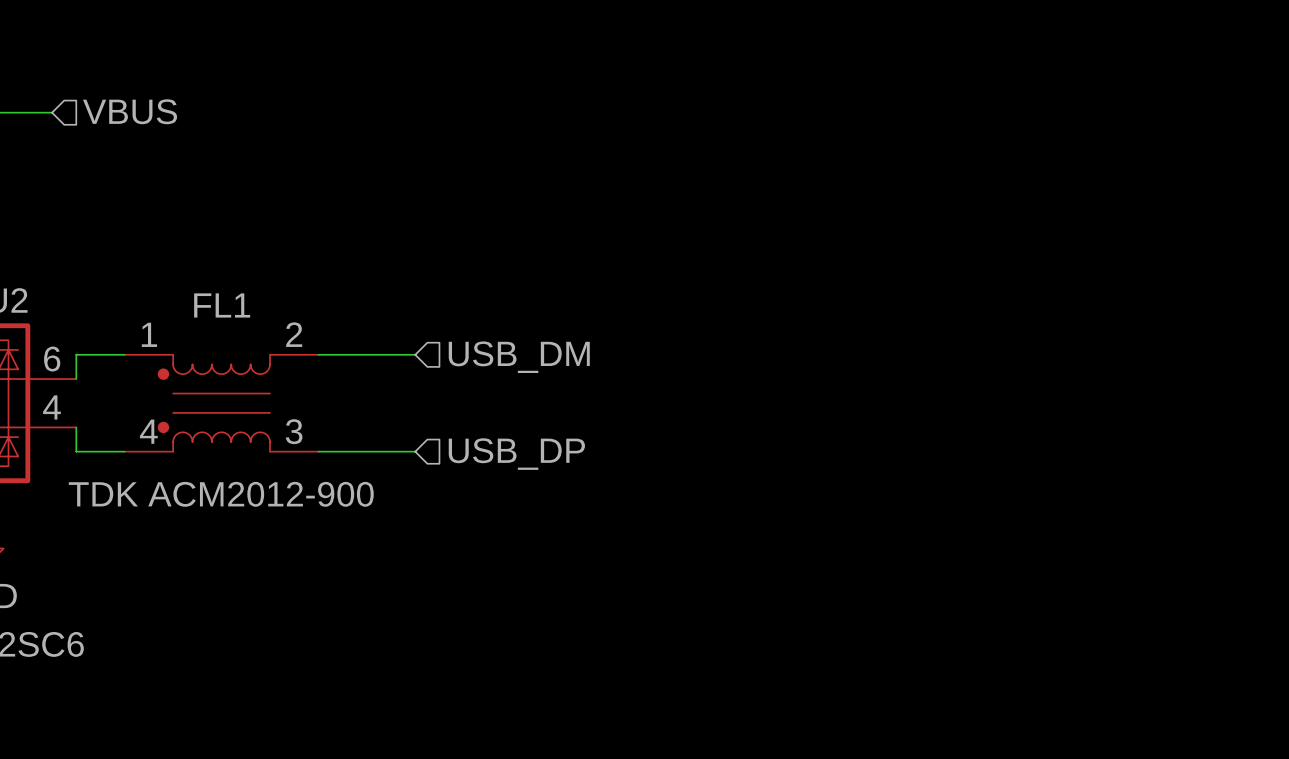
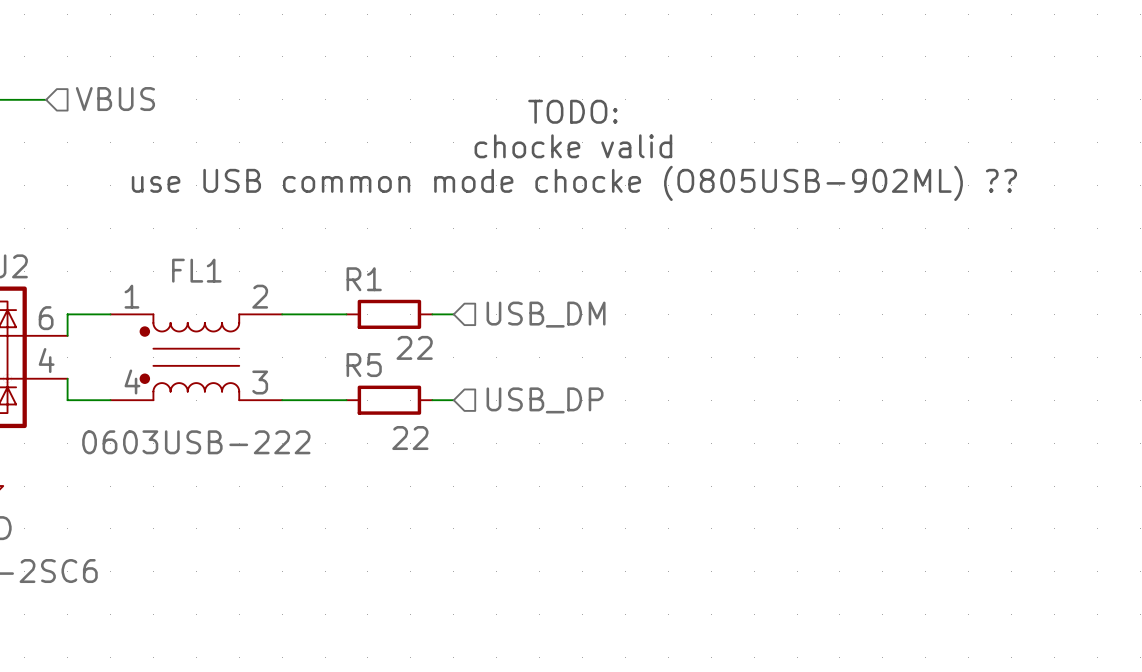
text: none -> TODO: (572, 111)
text: none -> chocke valid (573, 146)
text: none -> use USB common mode chocke (O805USB-902ML) ?? (574, 183)
R1: none -> 22 (389, 314)
hierarchical label position: USB_DM (519, 357) -> USB_DM (546, 314)
R5: none -> 22 (389, 400)
hierarchical label position: USB_DP (516, 454) -> USB_DP (545, 400)
FL1 value: TDK ACM2012-900 (221, 494) -> 0603USB-222 (196, 442)

